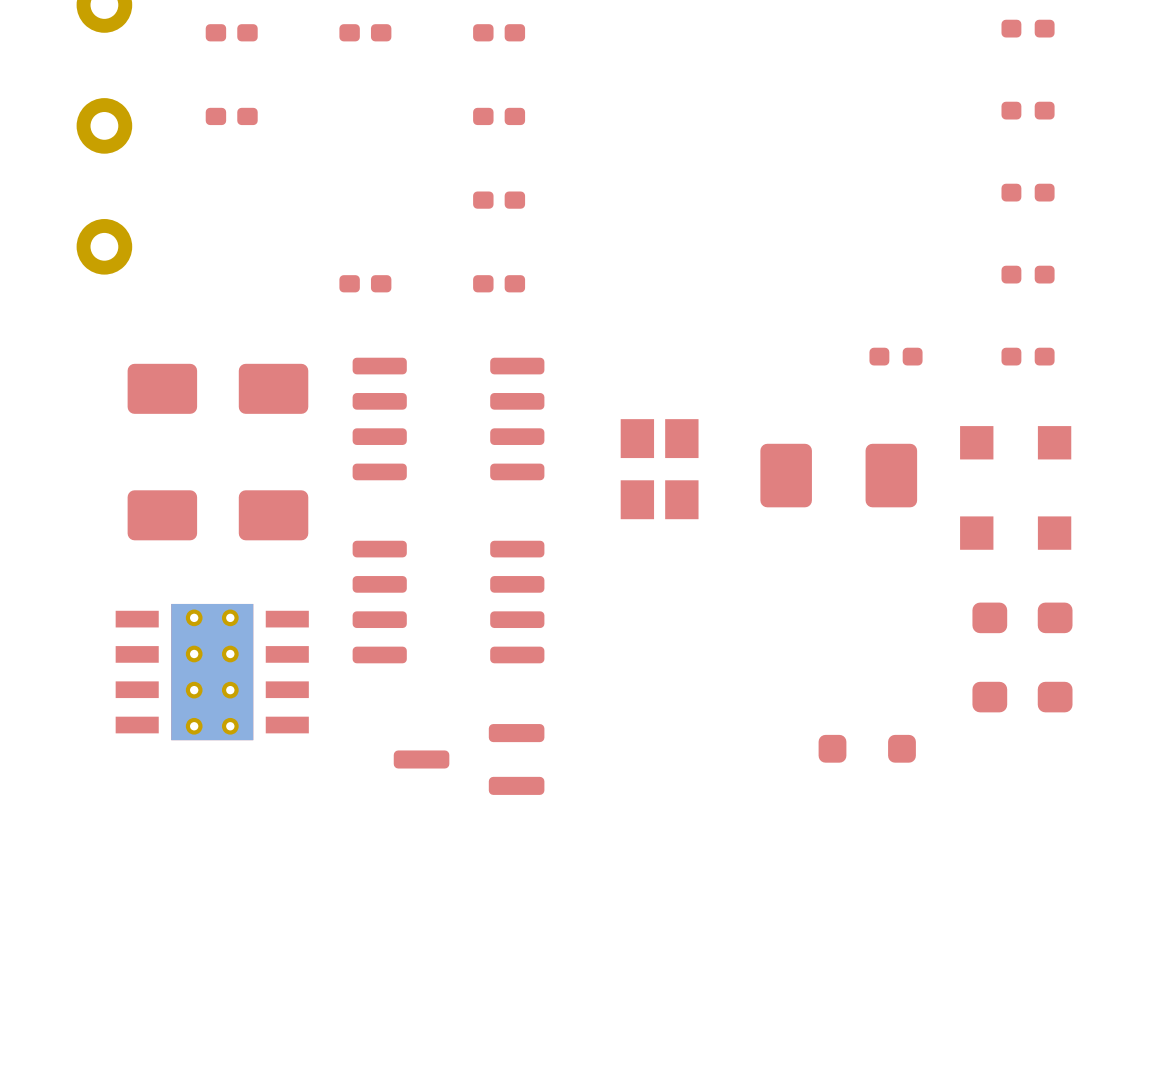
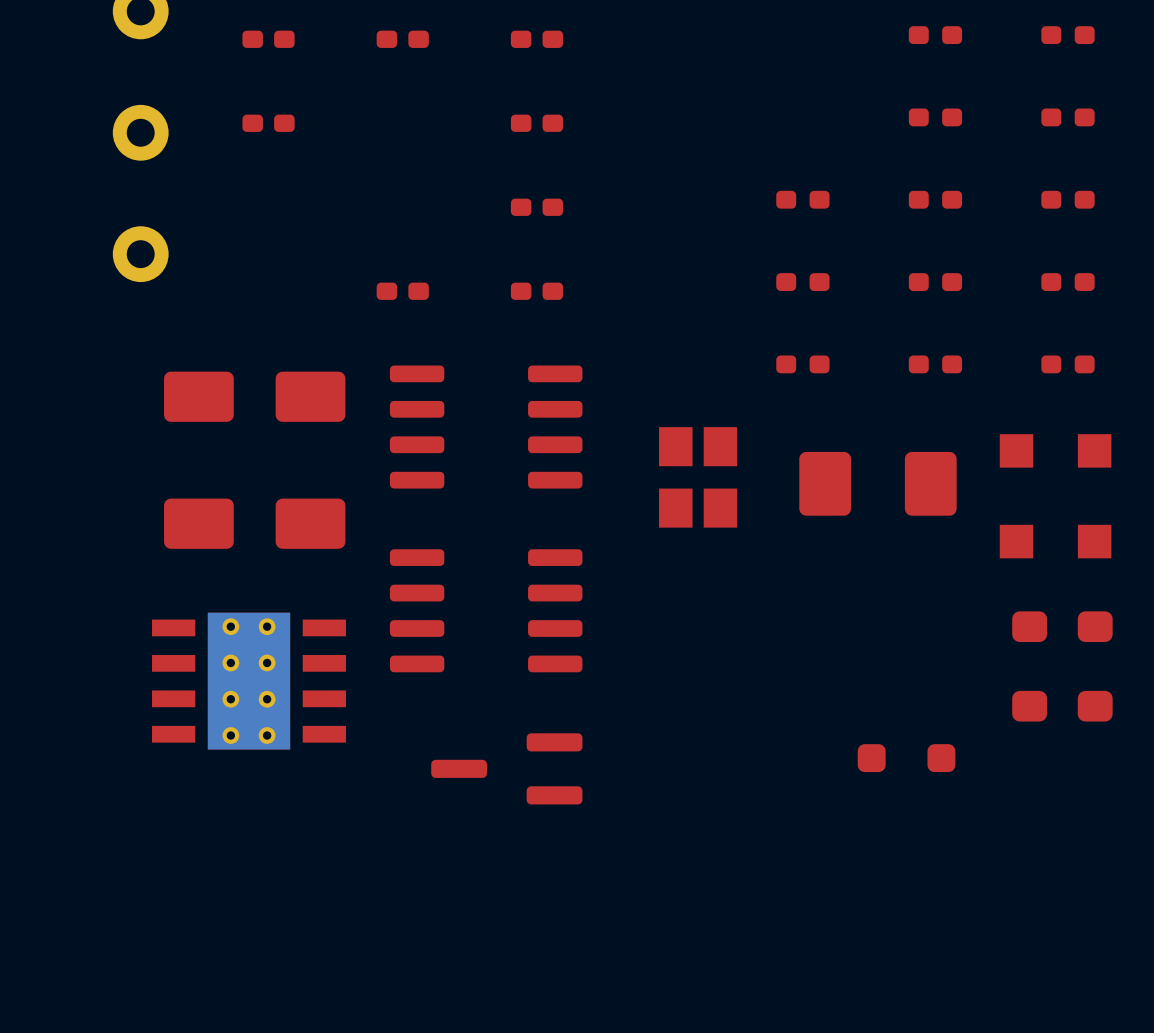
part: none -> (935, 35)
part: none -> (935, 117)
part: none -> (802, 199)
part: none -> (935, 199)
part: none -> (802, 282)
part: none -> (935, 282)
part: none -> (802, 364)

